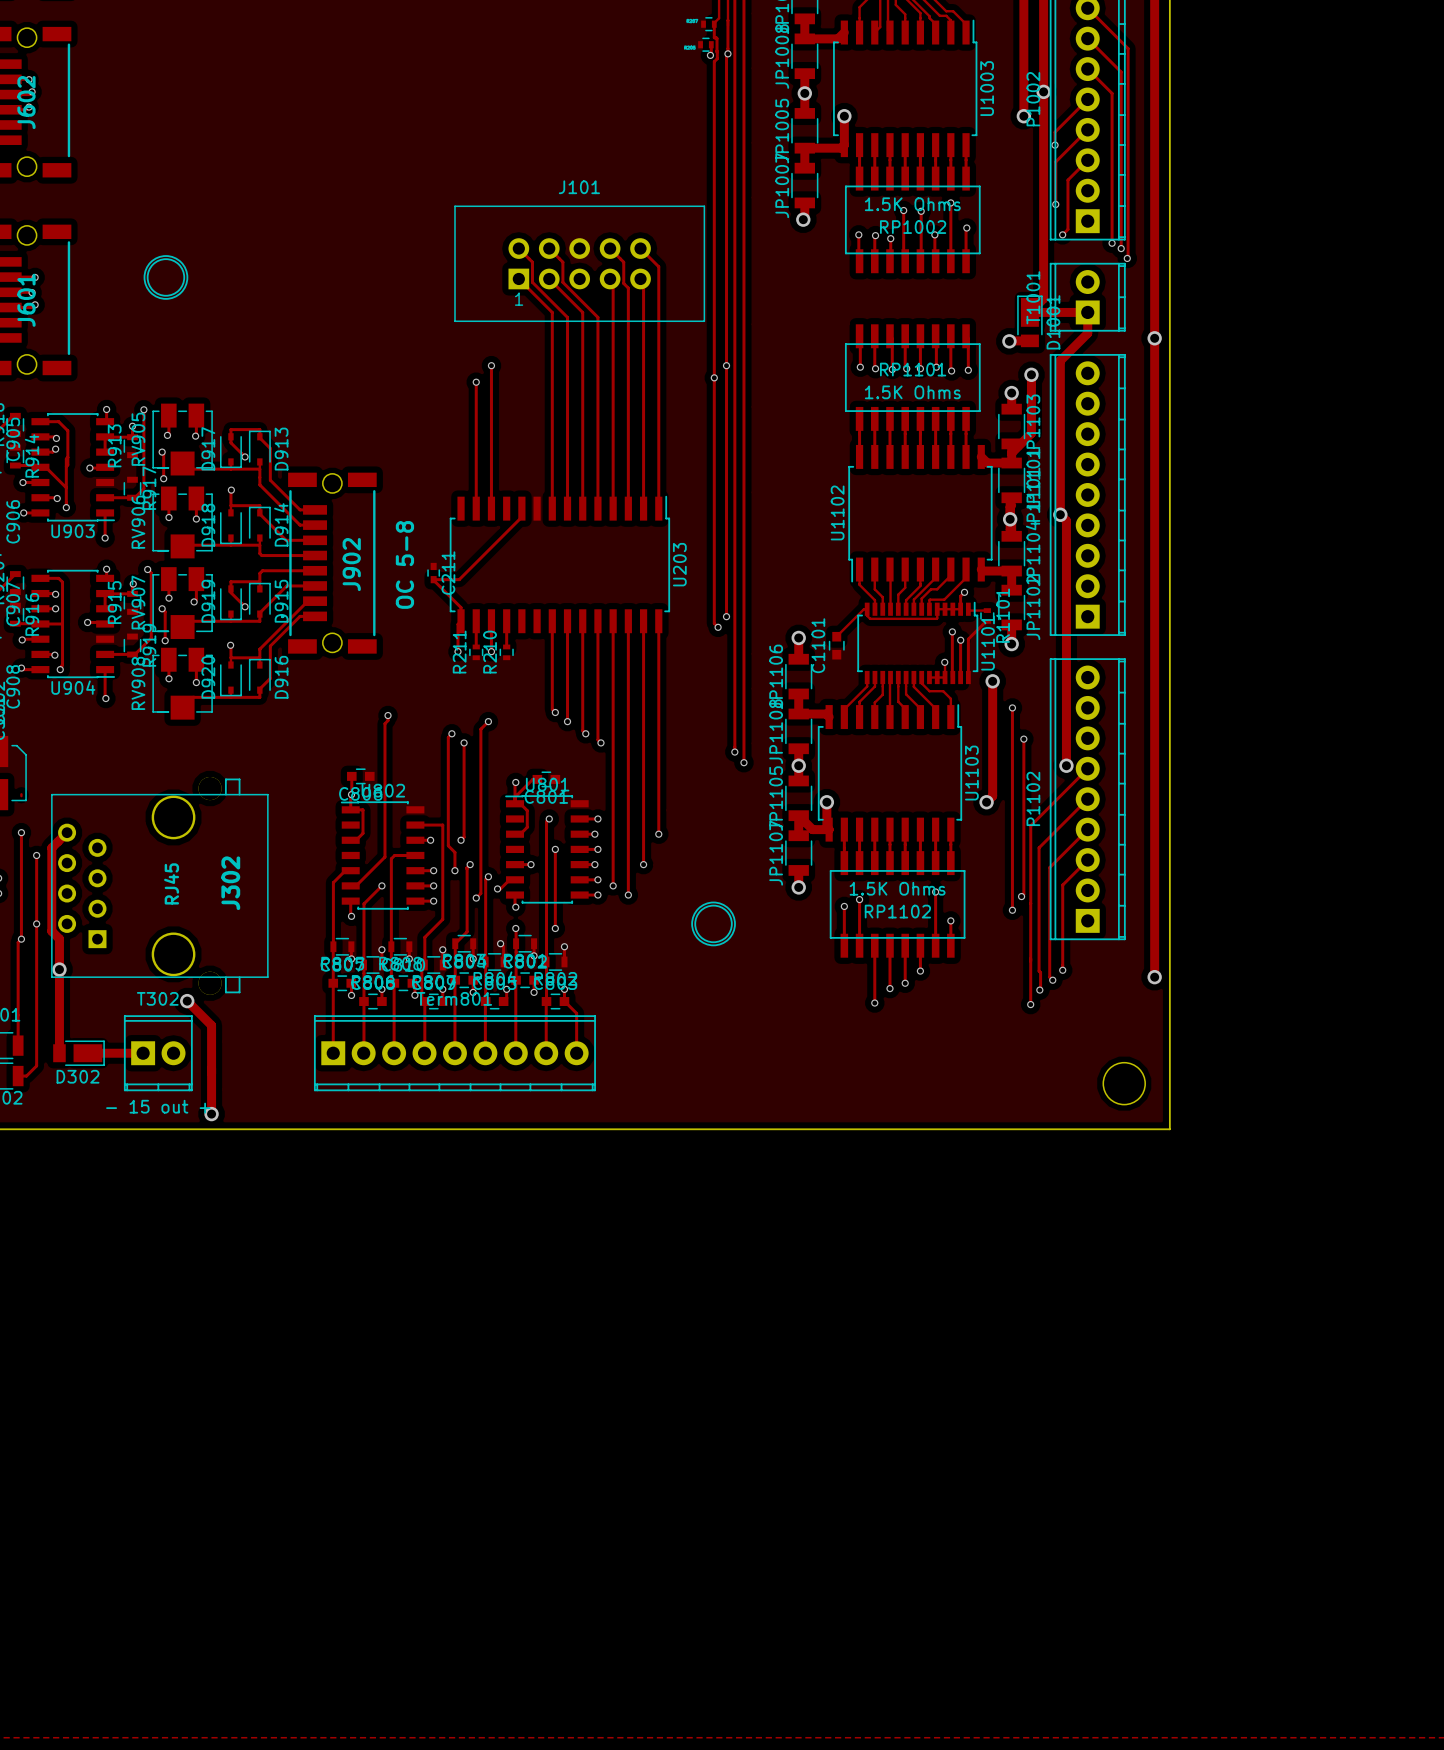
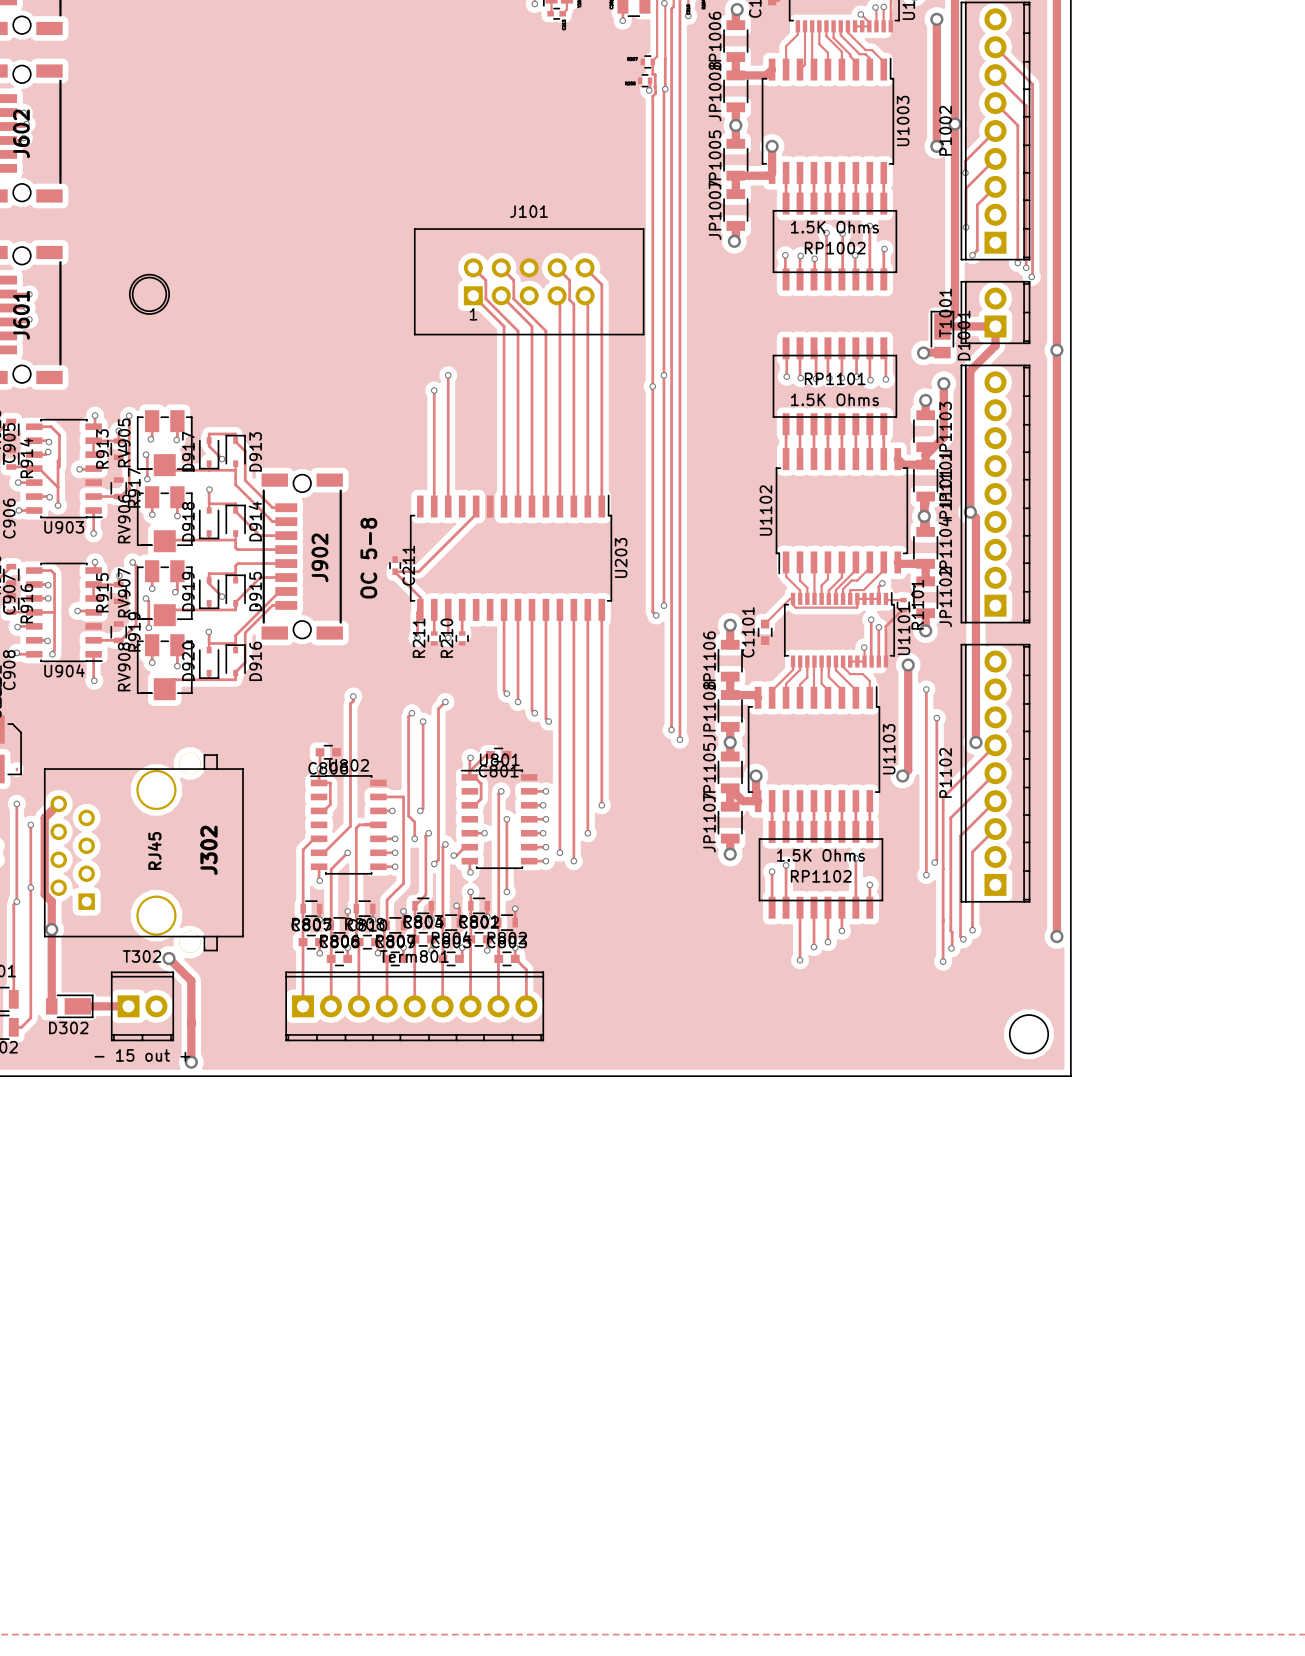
drawing: [691, 901, 736, 947] -> none

